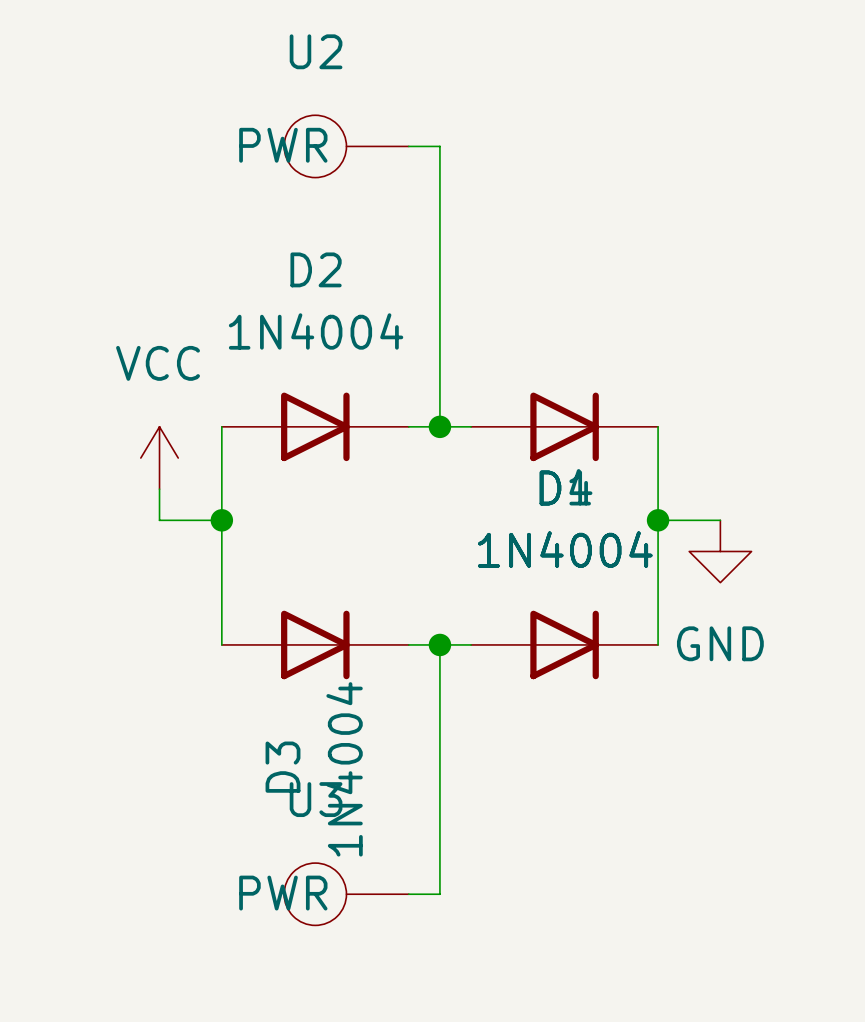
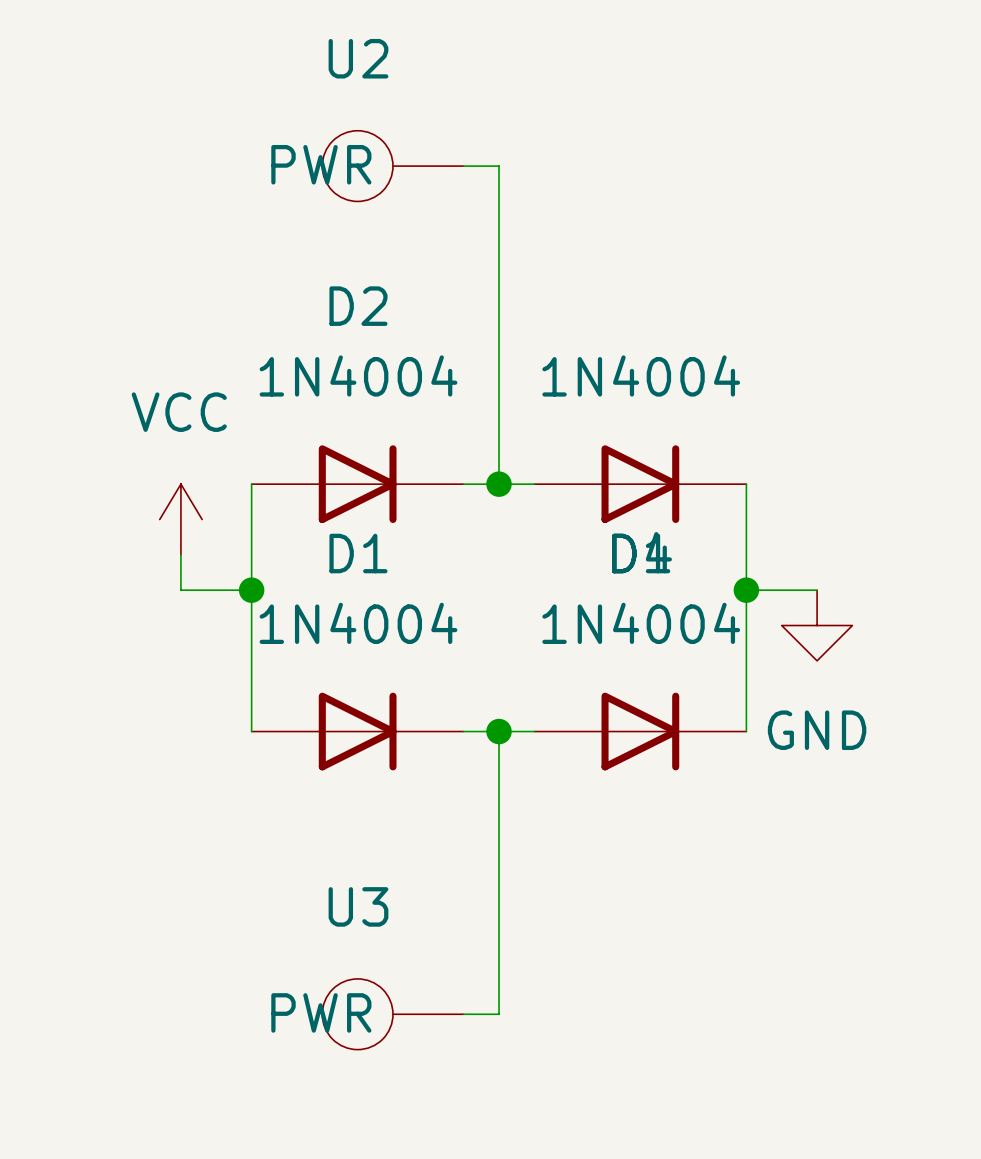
part value position: 1N4004 (565, 549) -> 1N4004 (641, 375)
D3 name: D3 (282, 767) -> D1 (358, 553)
D3 value rotation: 0° (344, 769) -> 90° clockwise (358, 623)
D3 value position: 1N4004 (344, 769) -> 1N4004 (358, 623)

